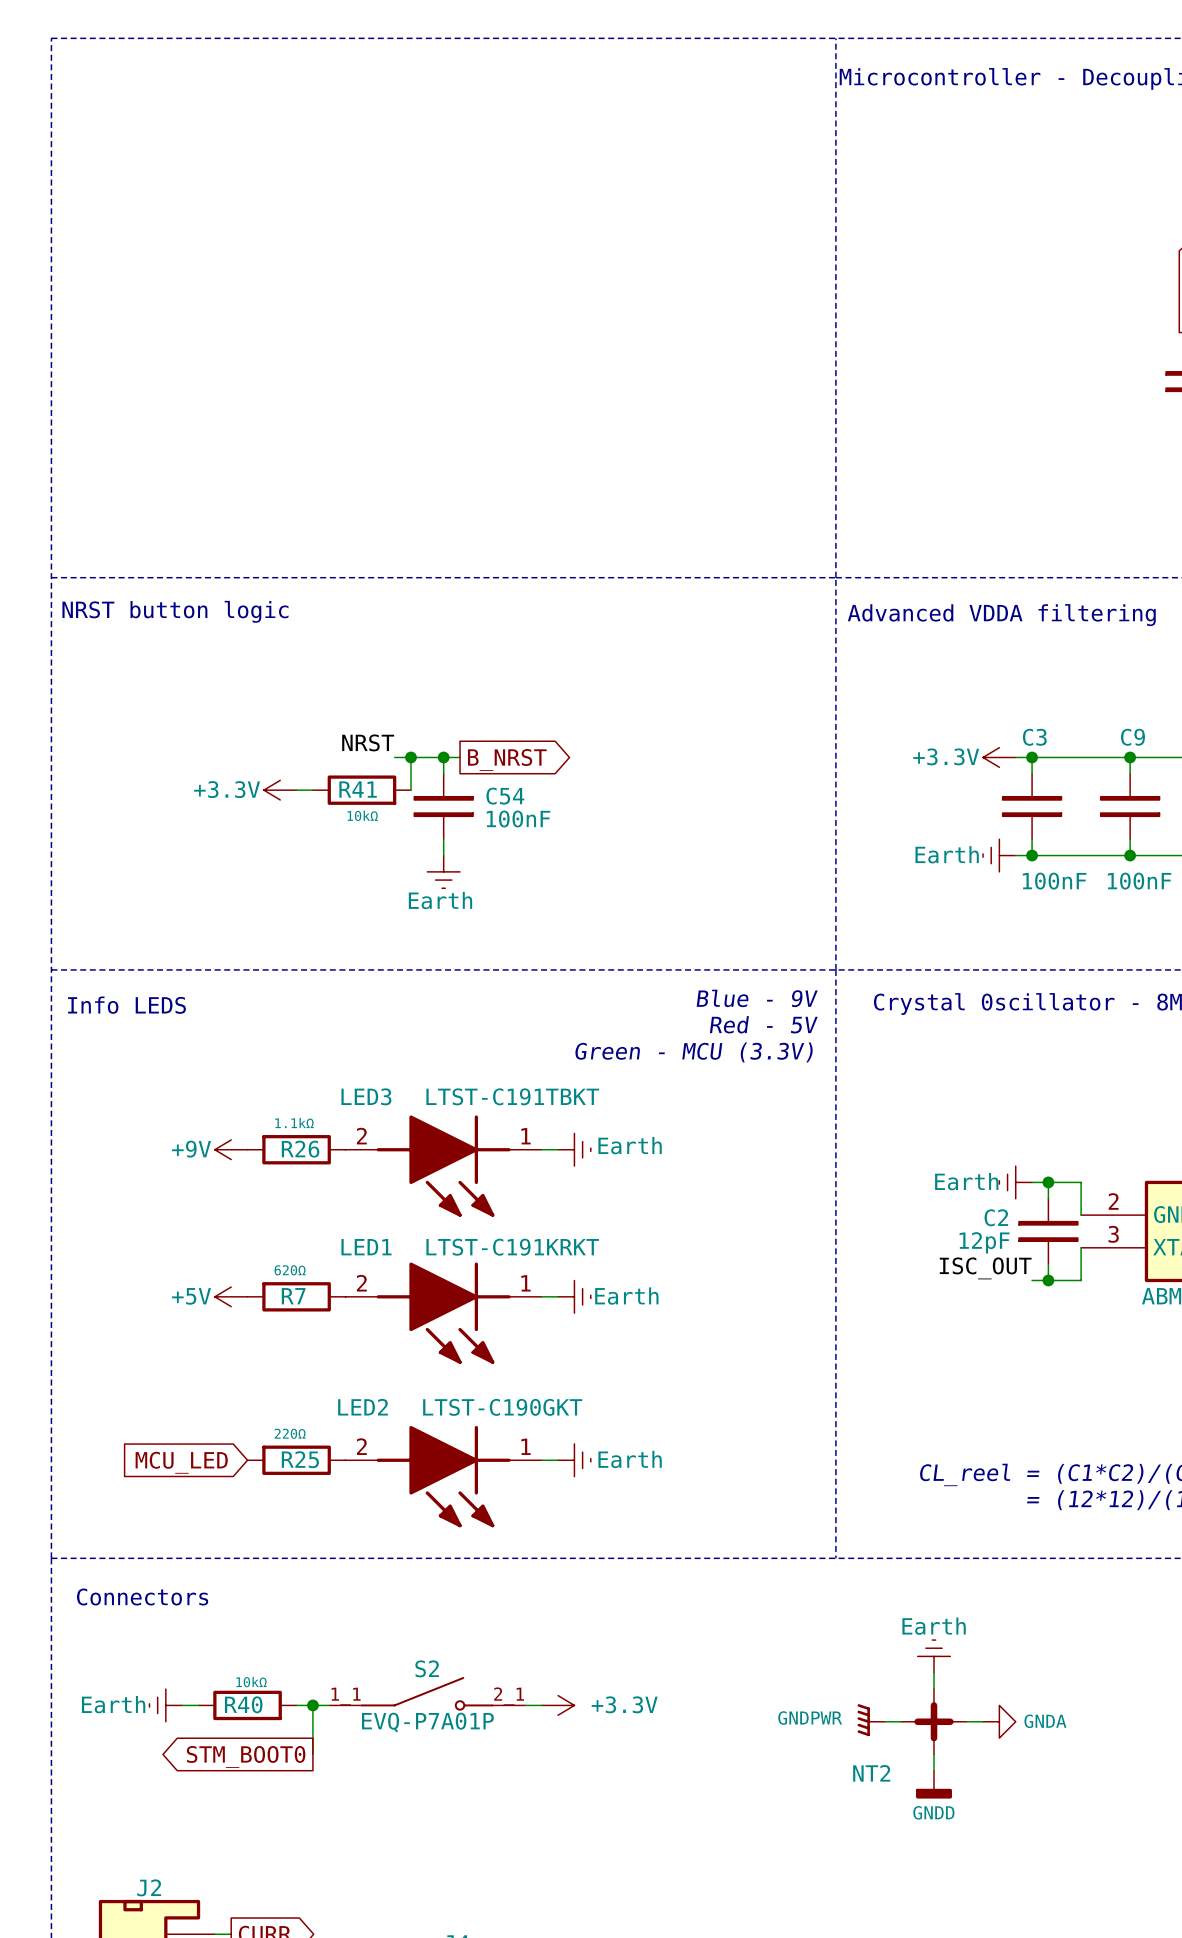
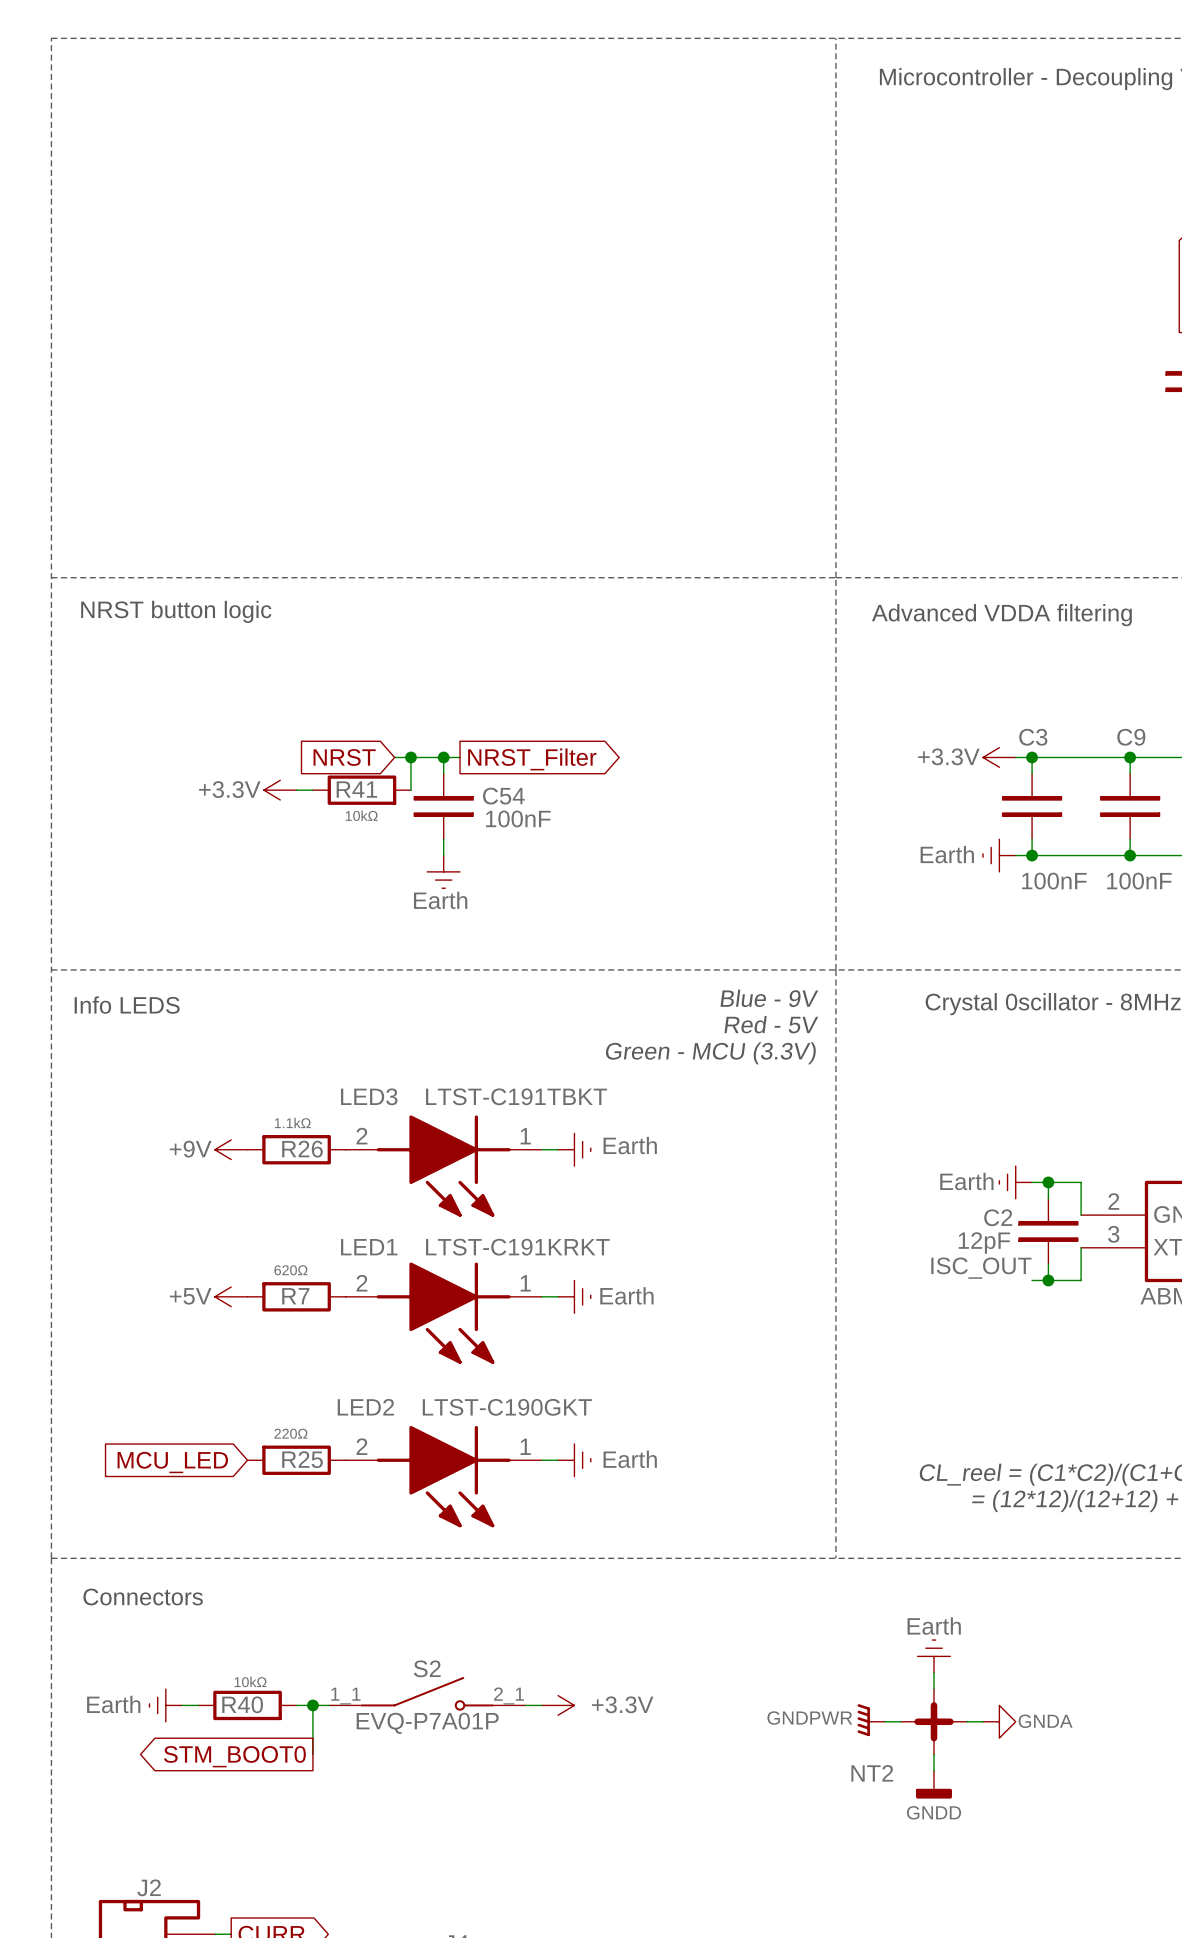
label: NRST (368, 742) -> none
global label: none -> NRST (344, 757)
global label: B_NRST (507, 759) -> NRST_Filter (532, 759)

